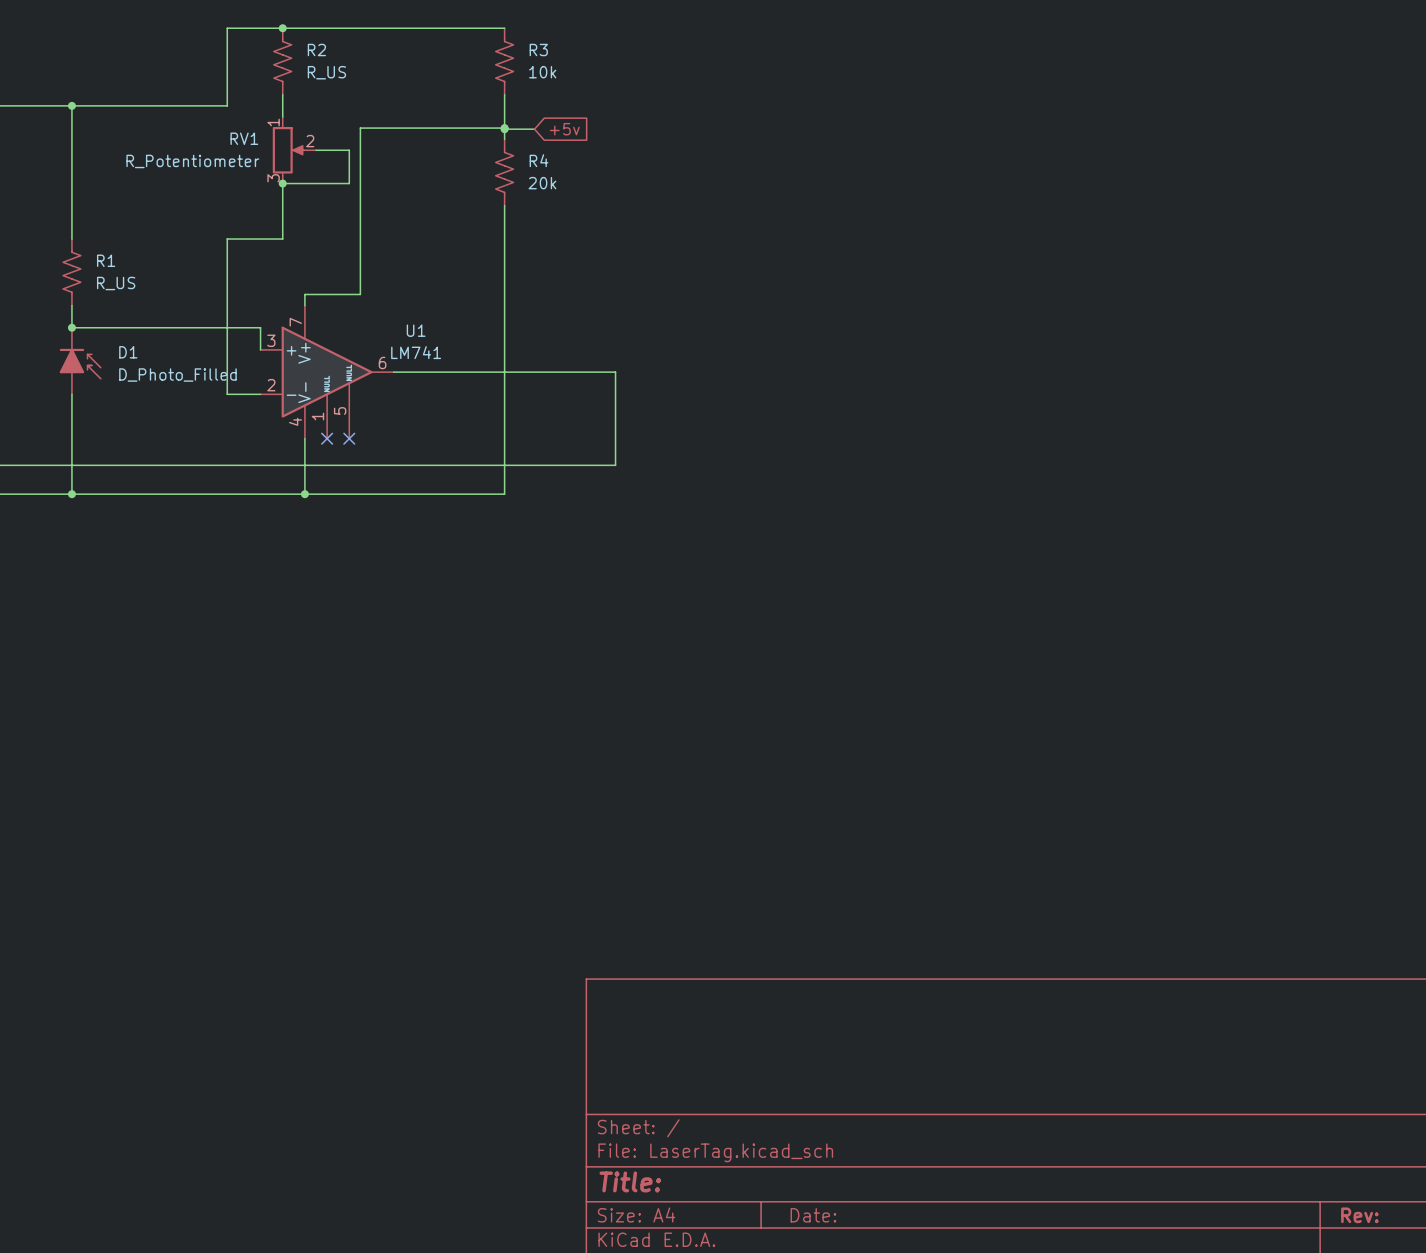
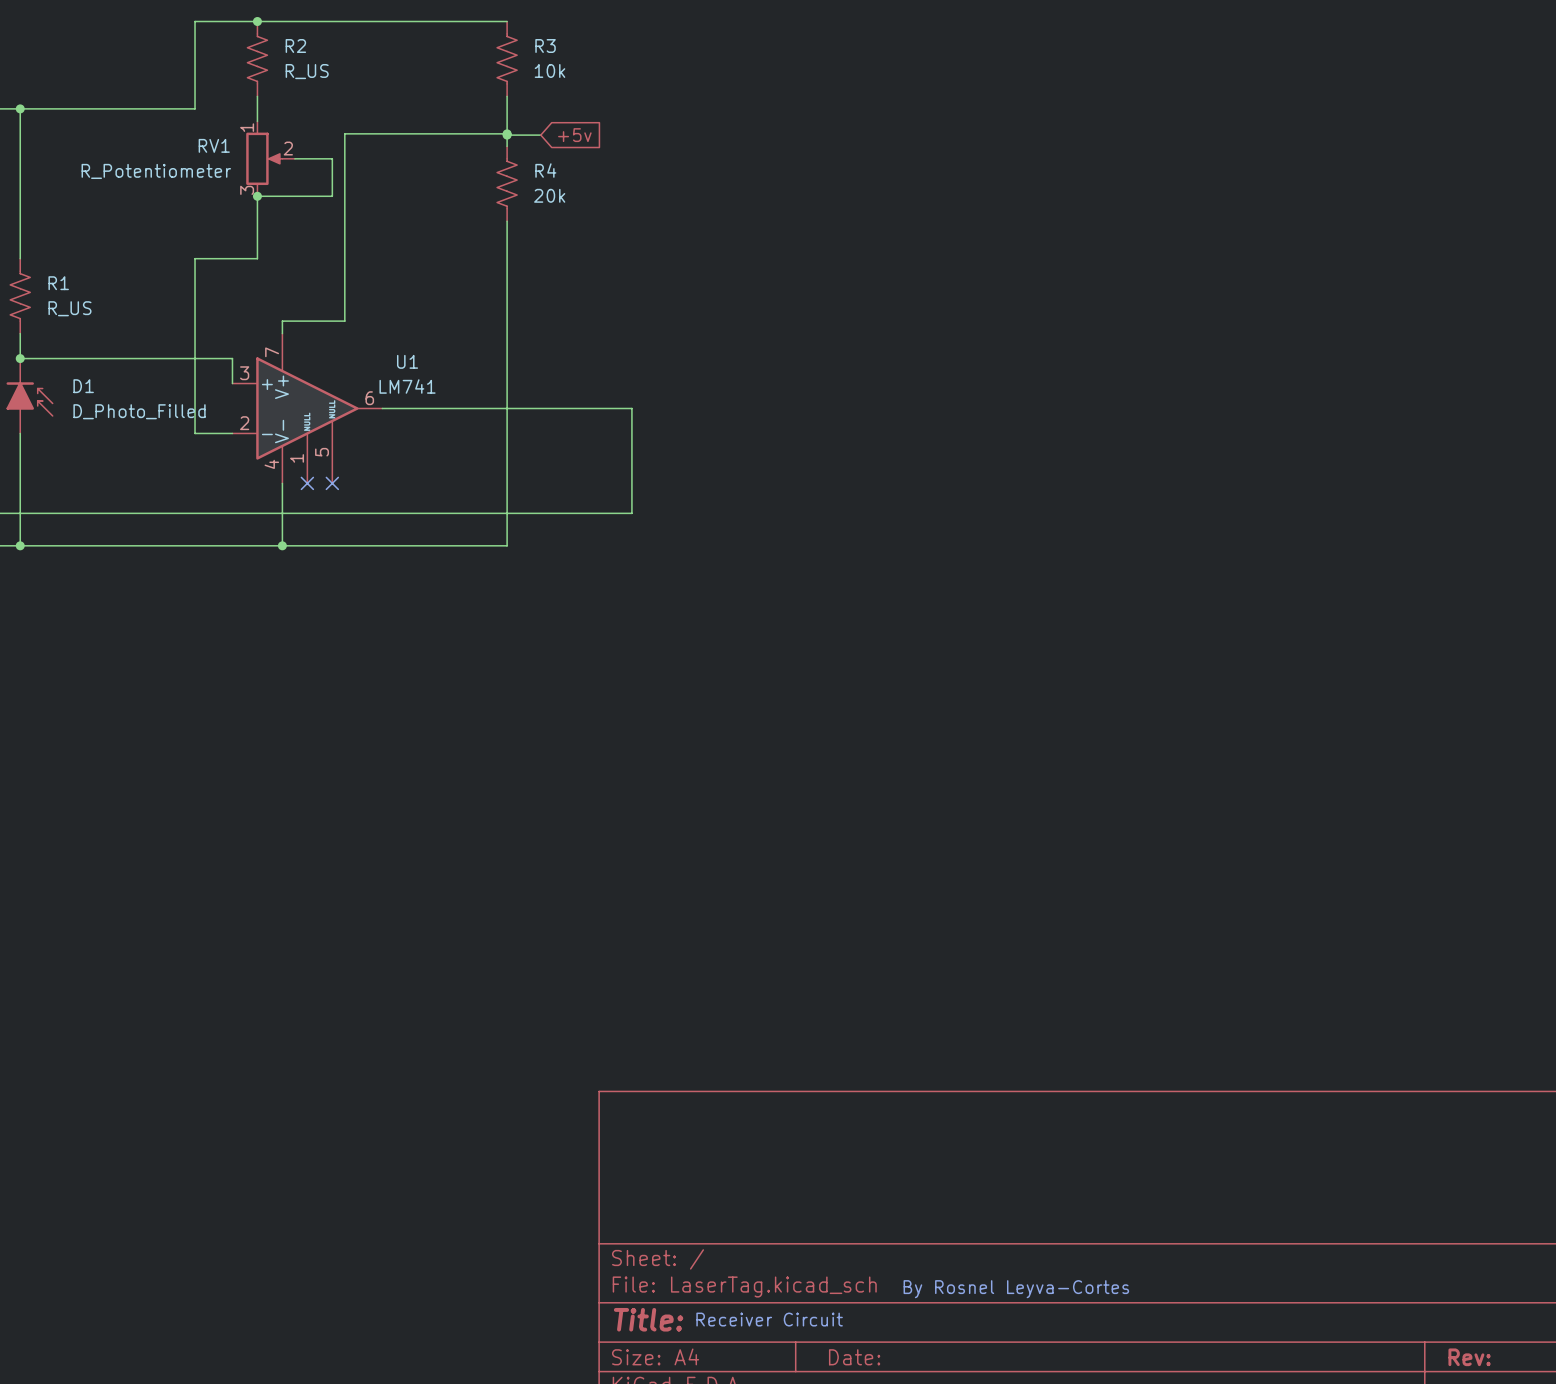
text: none -> By Rosnel Leyva-Cortes (1016, 1289)
text: none -> Receiver Circuit (769, 1319)

